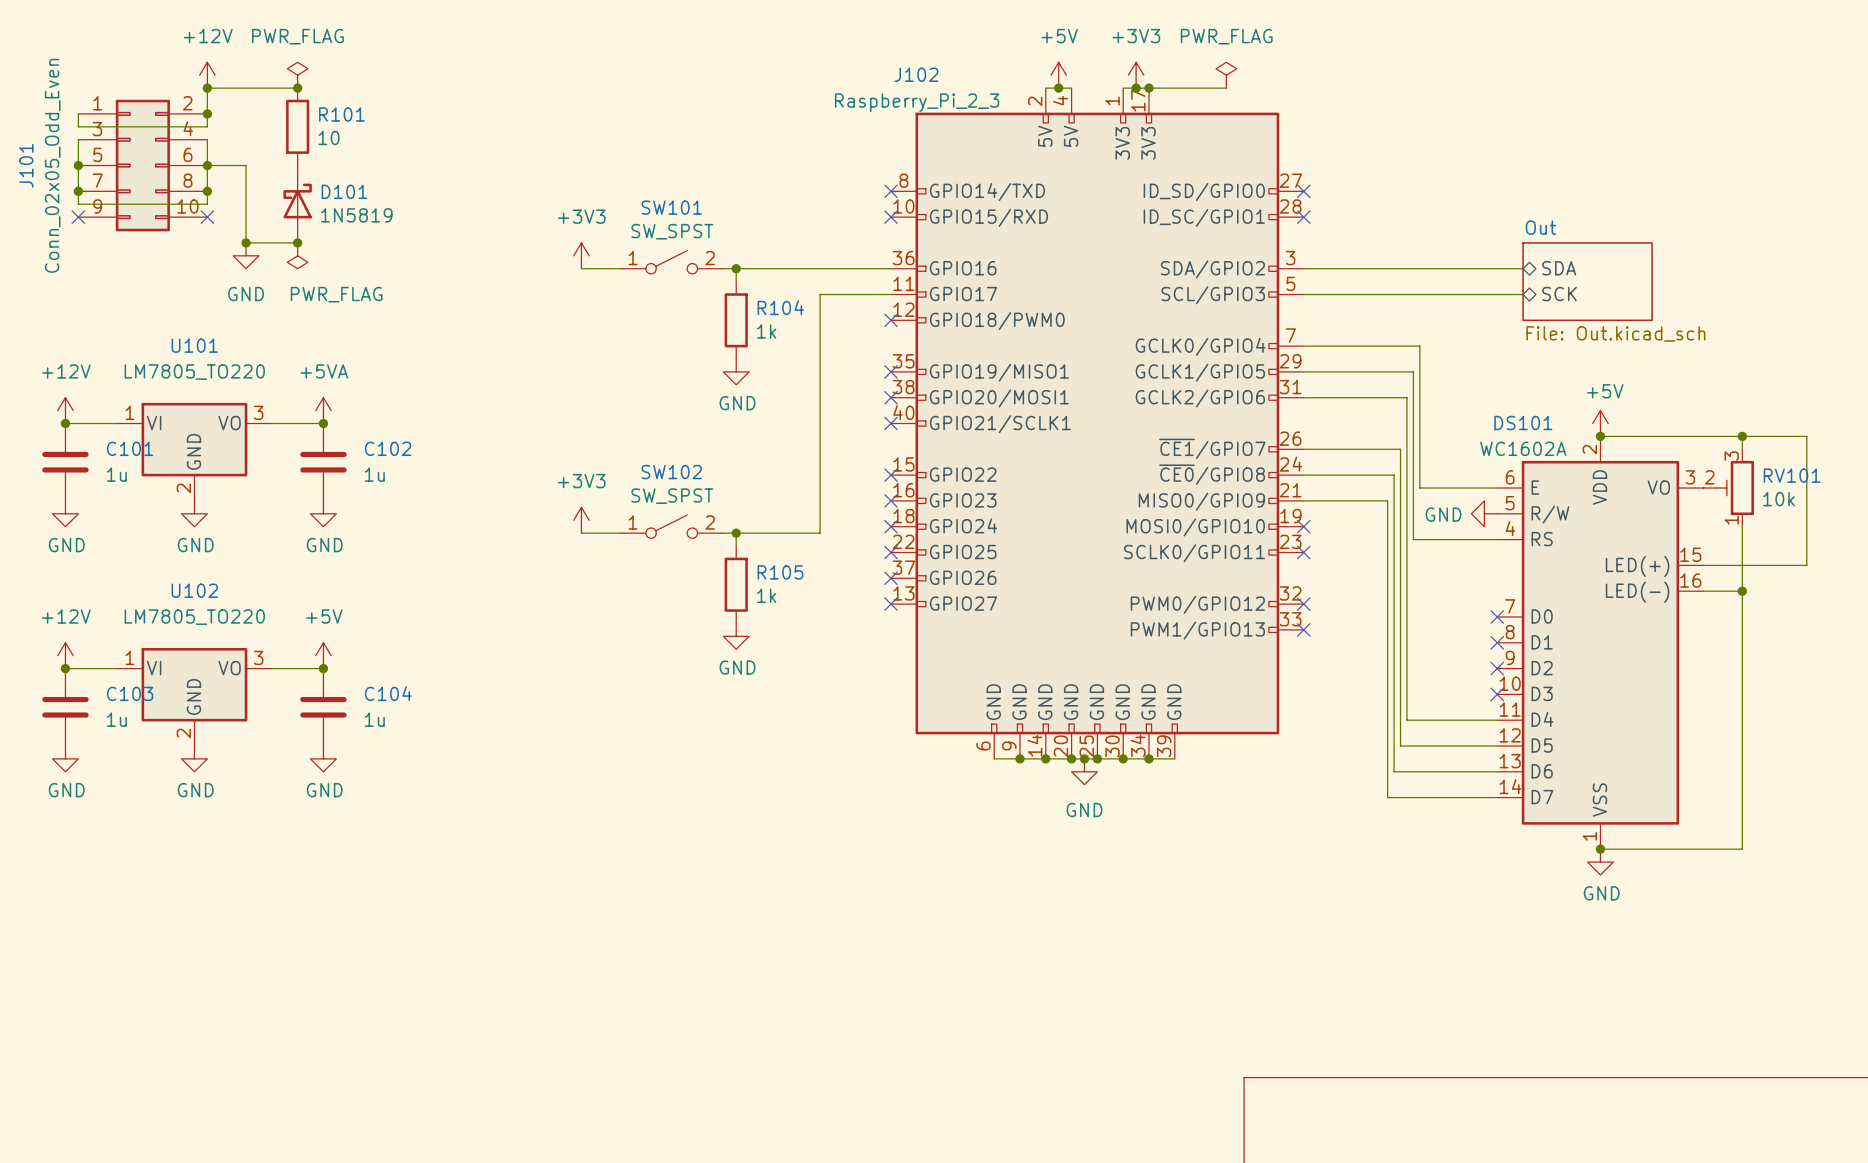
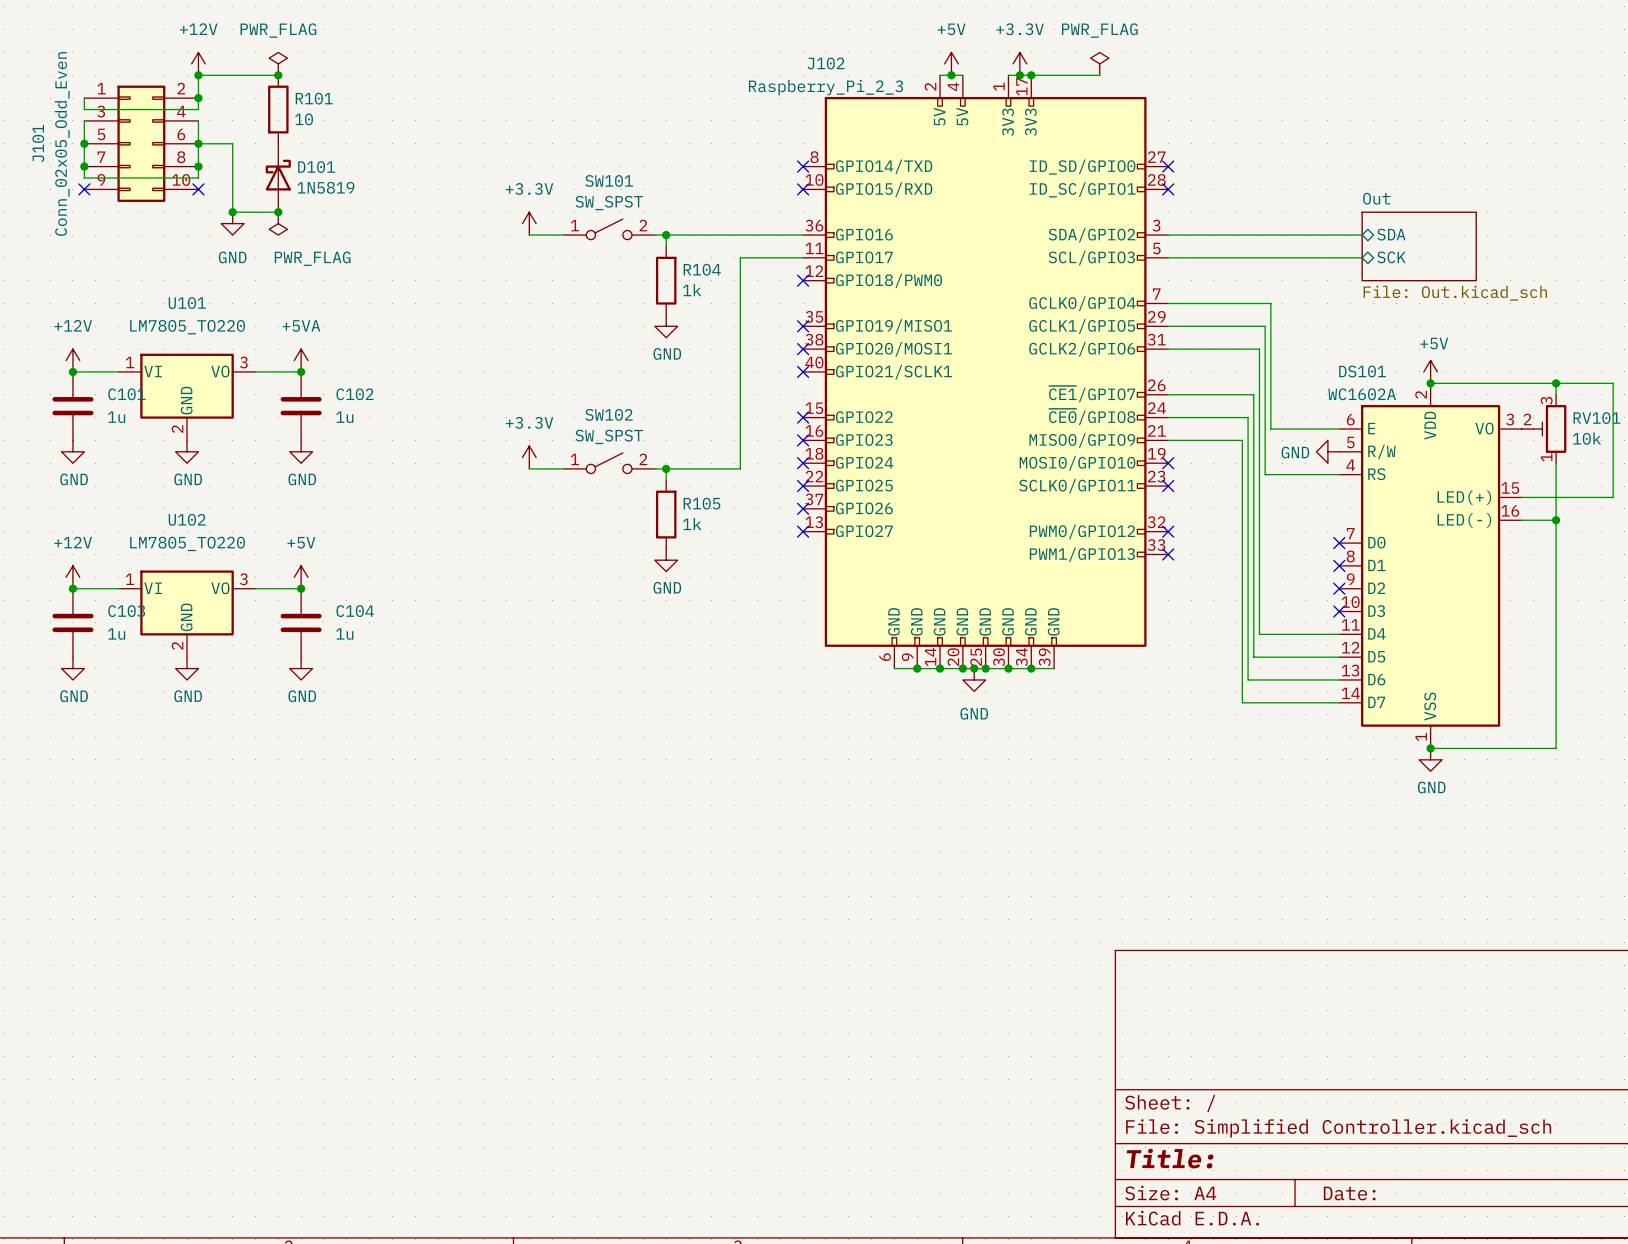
power symbol: +3V3 (1136, 75) -> +3.3V (1019, 63)
power symbol: +3V3 (581, 255) -> +3.3V (529, 223)
power symbol: +3V3 (581, 520) -> +3.3V (529, 457)

